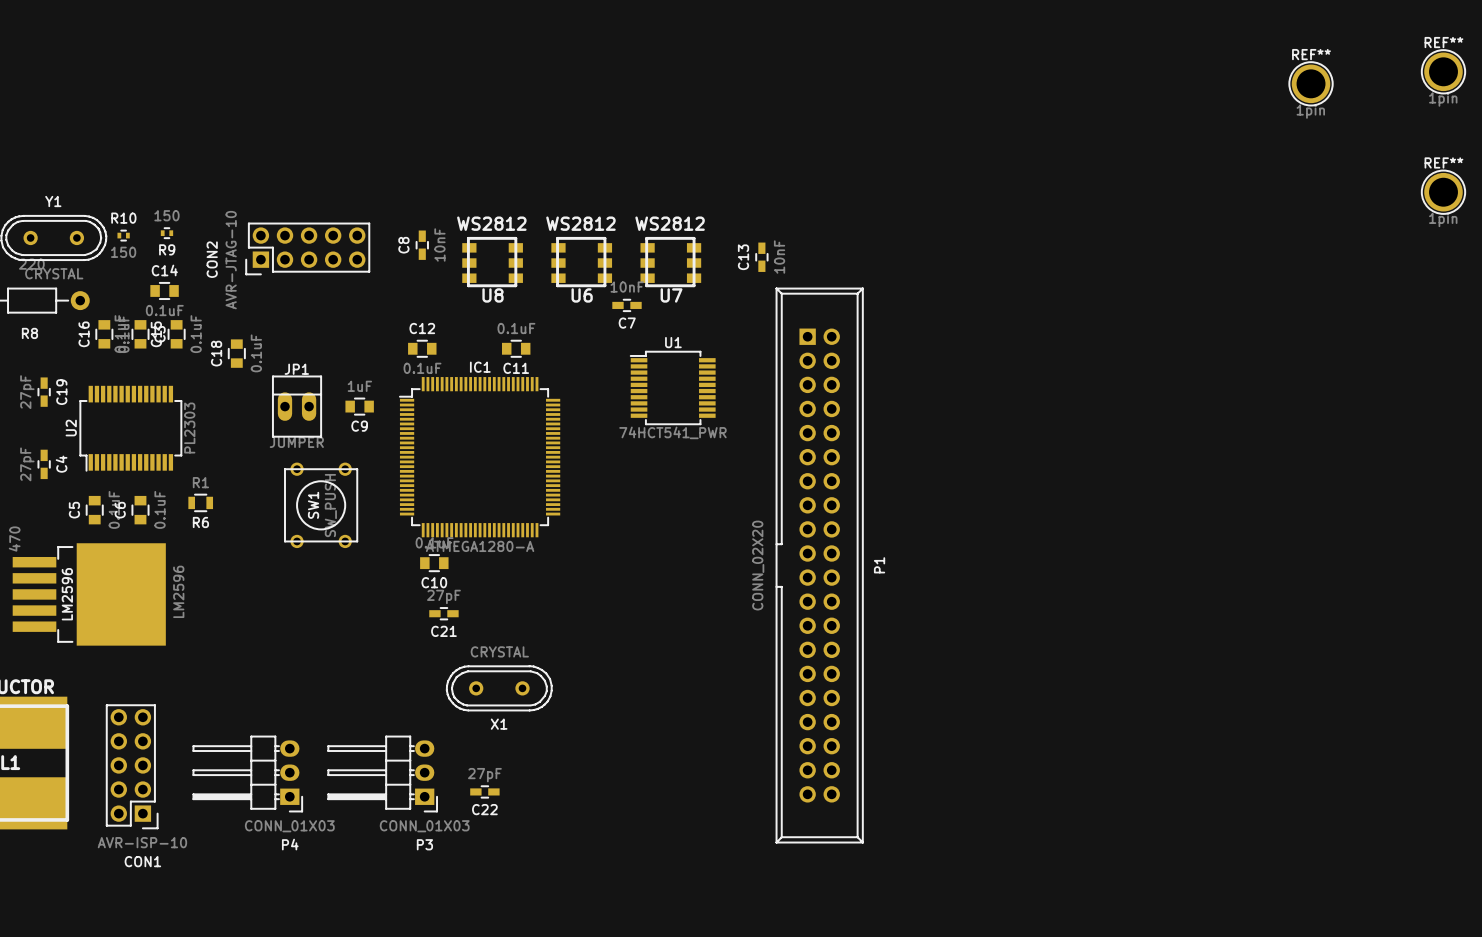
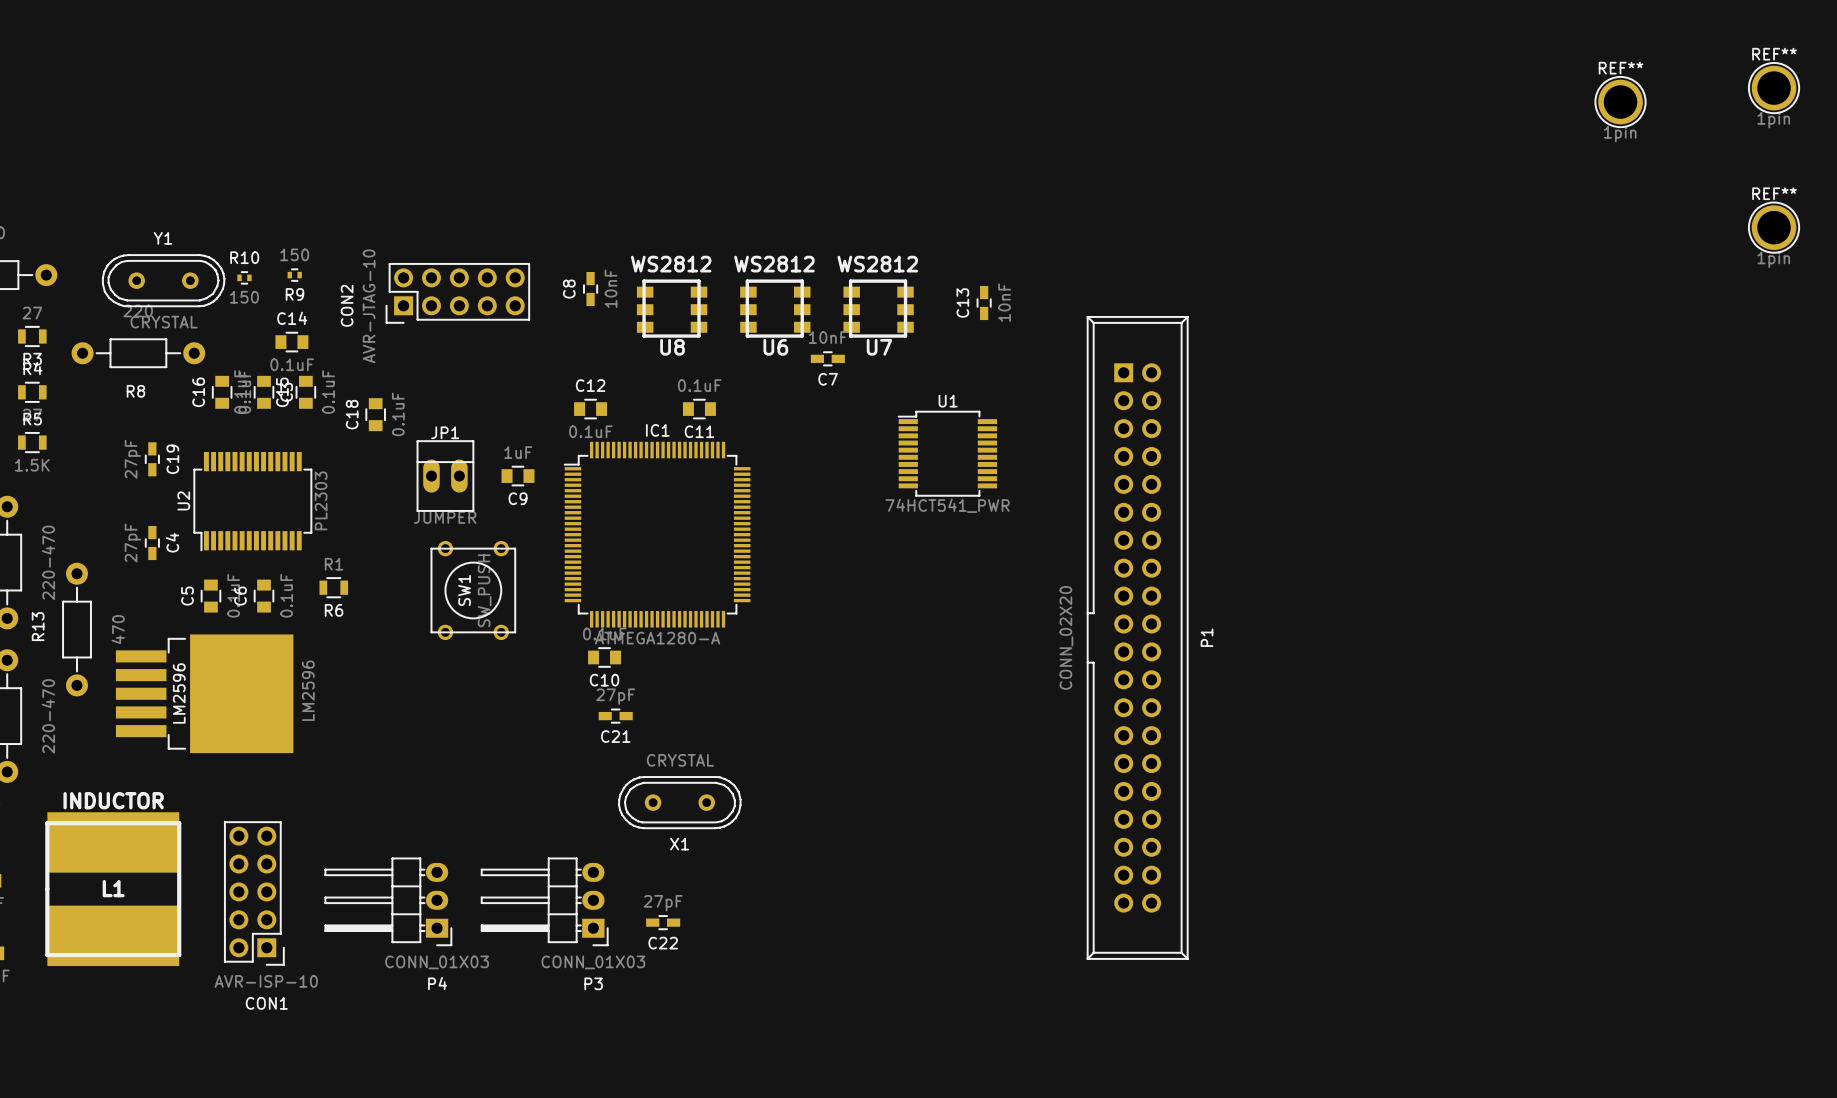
U1 position: (672, 387) -> (947, 453)
P1 position: (819, 565) -> (1137, 637)

